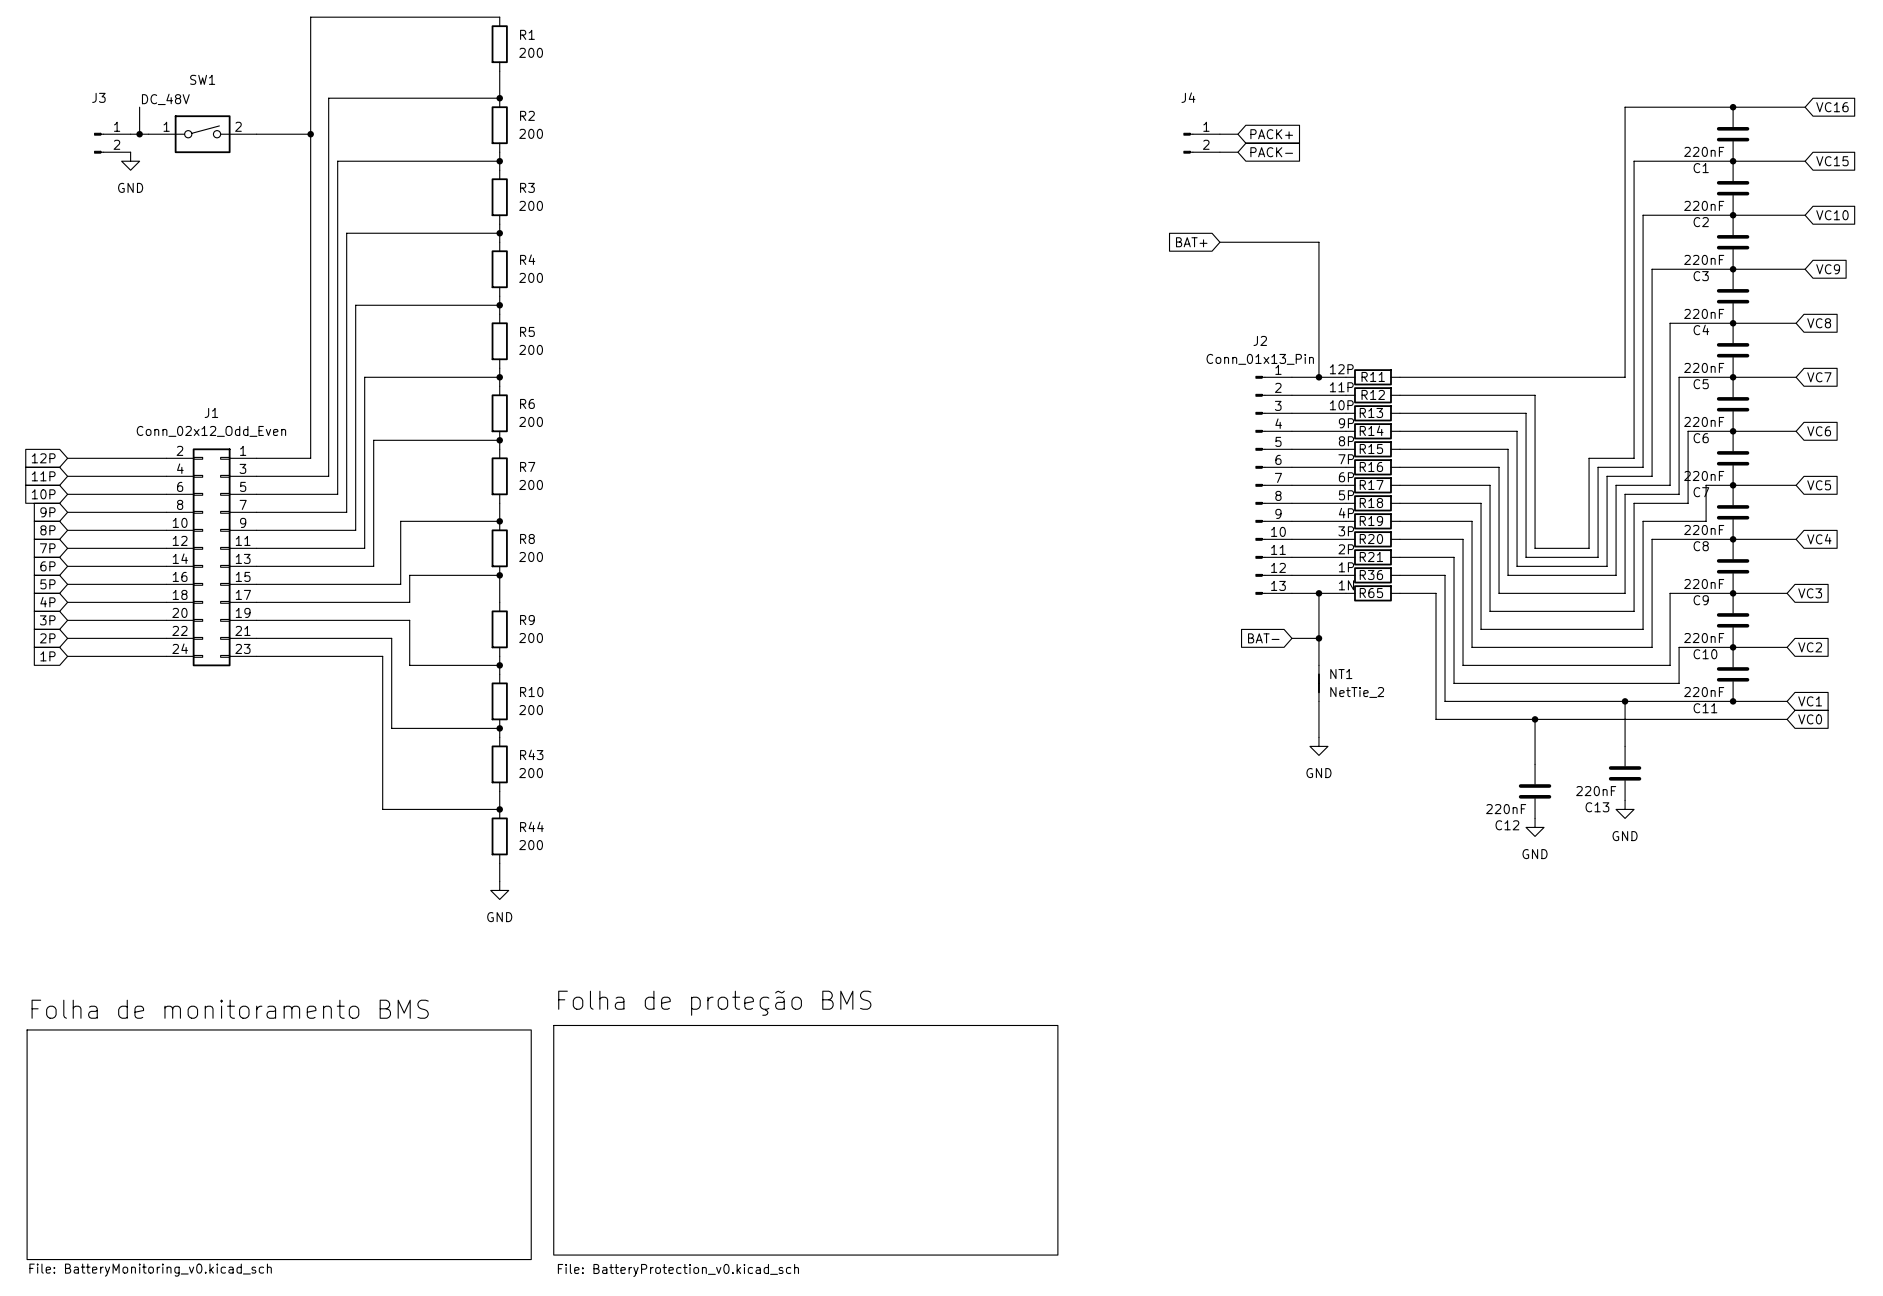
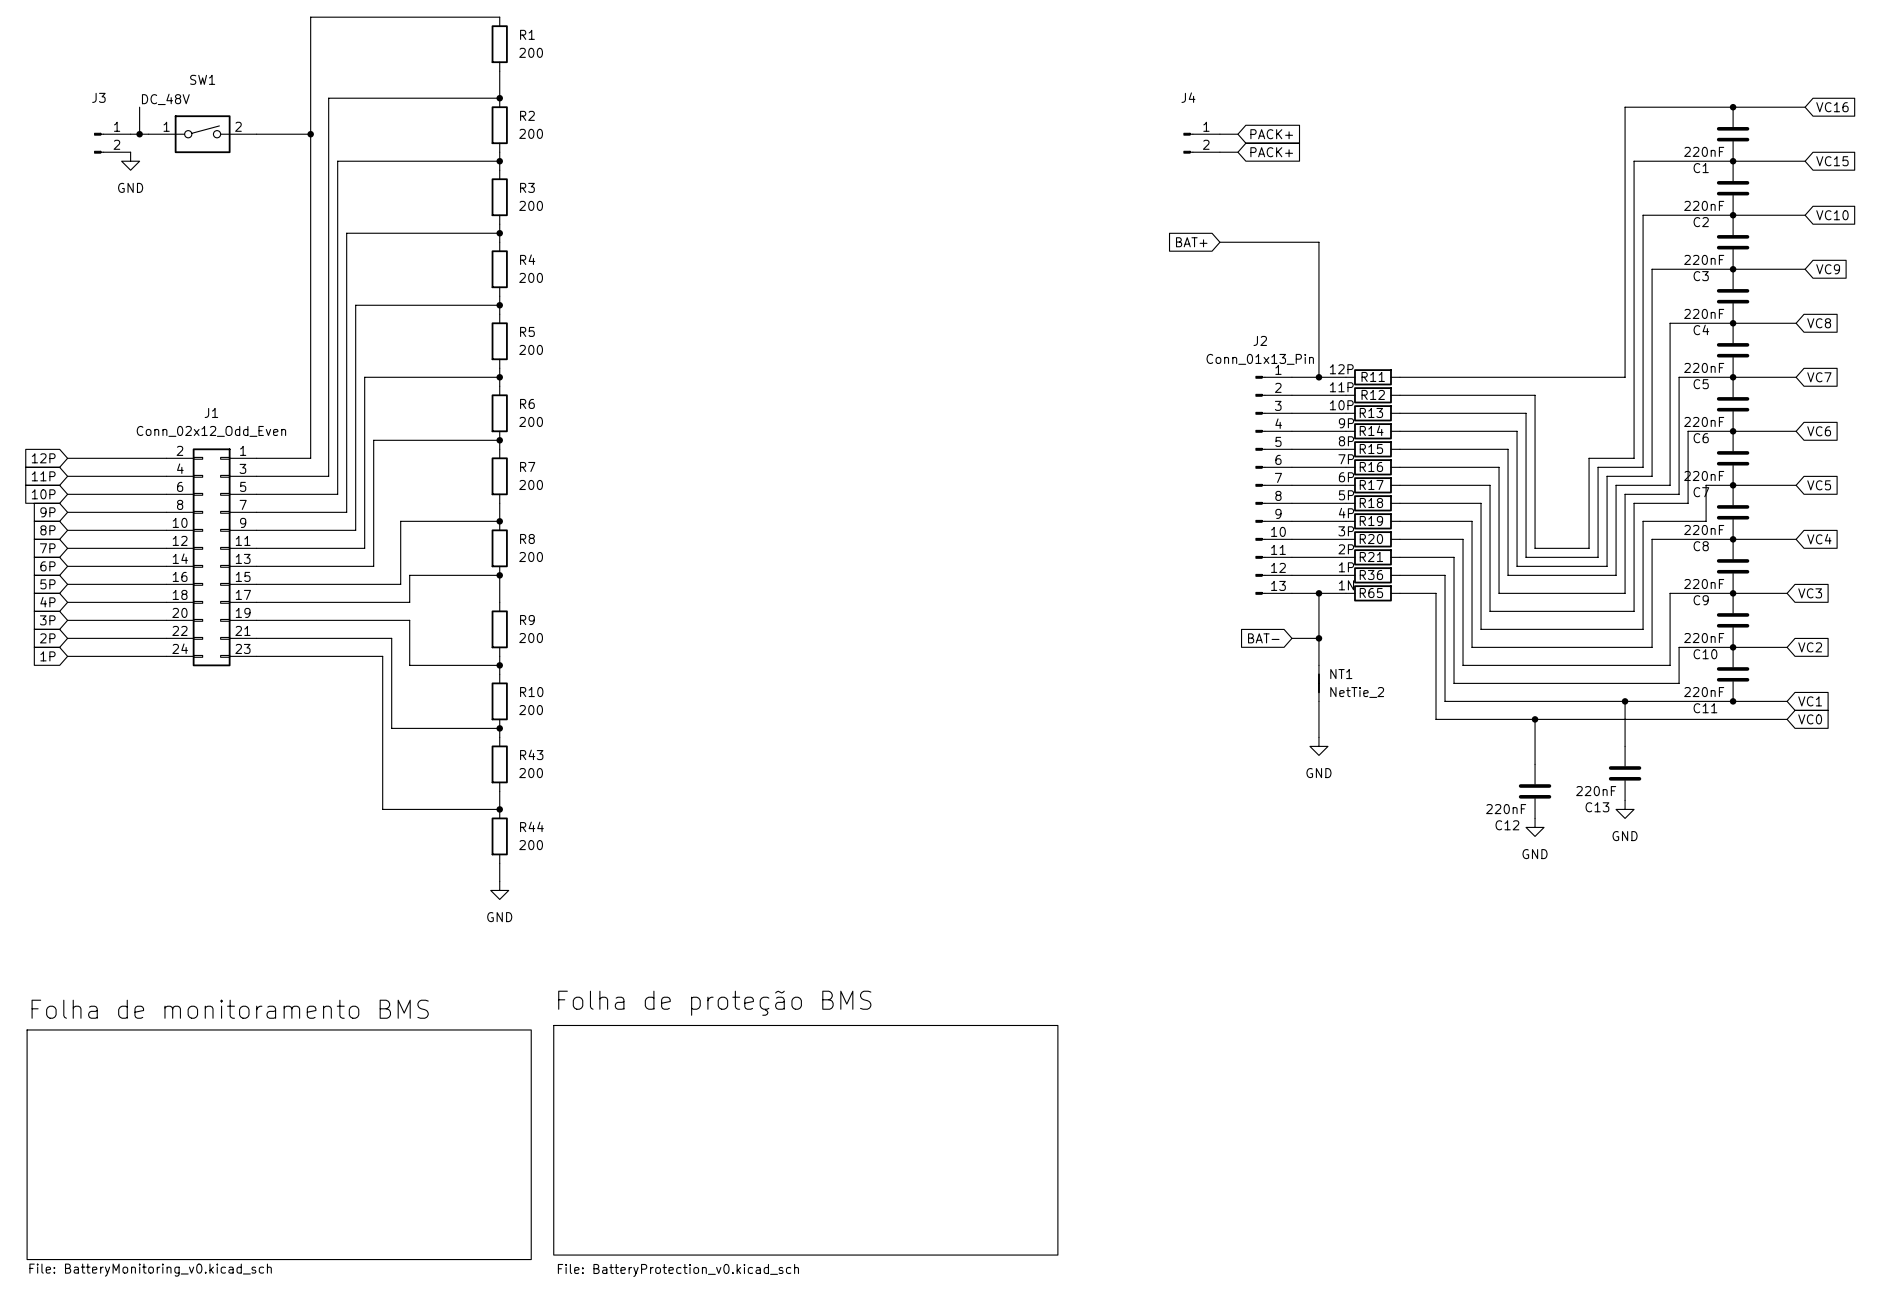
global label: PACK- (1271, 152) -> PACK+ (1271, 152)

